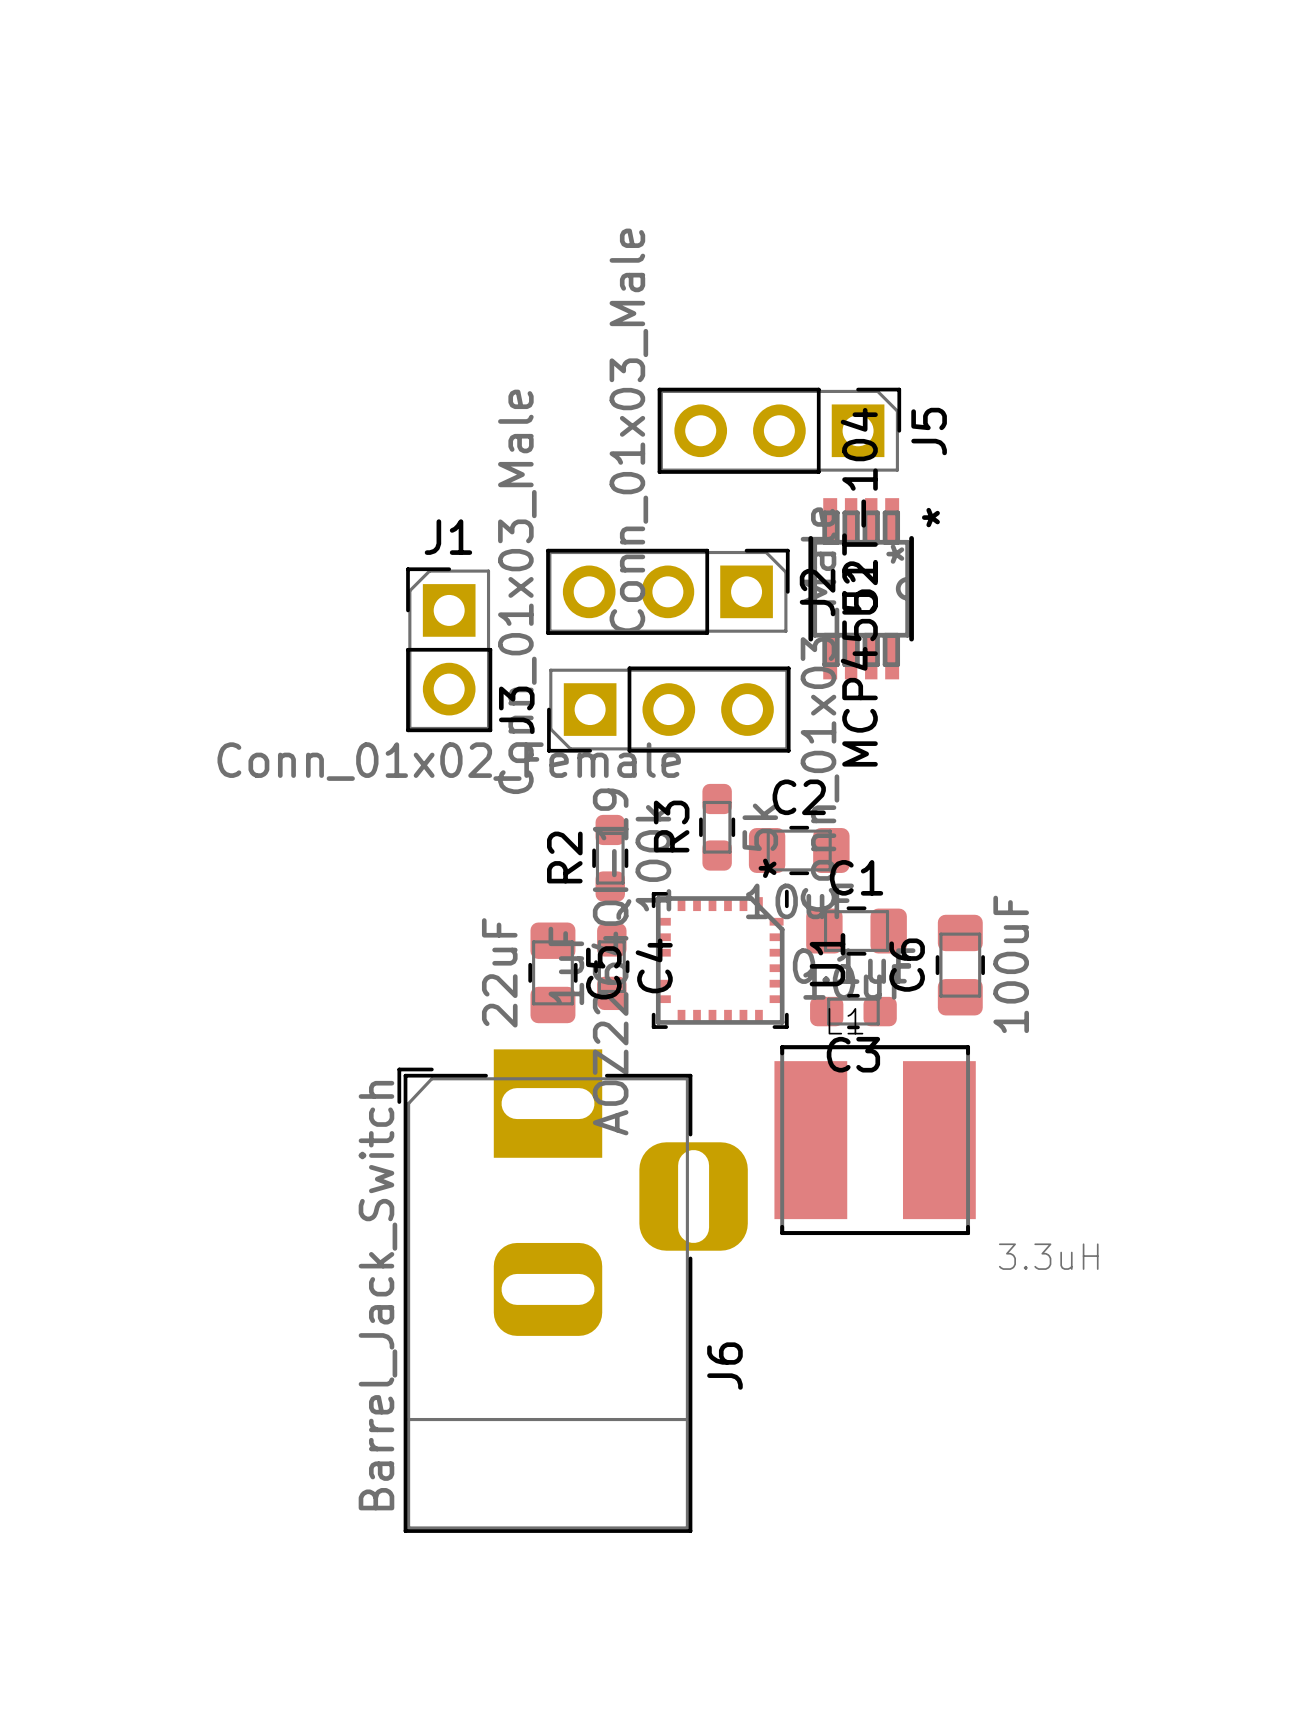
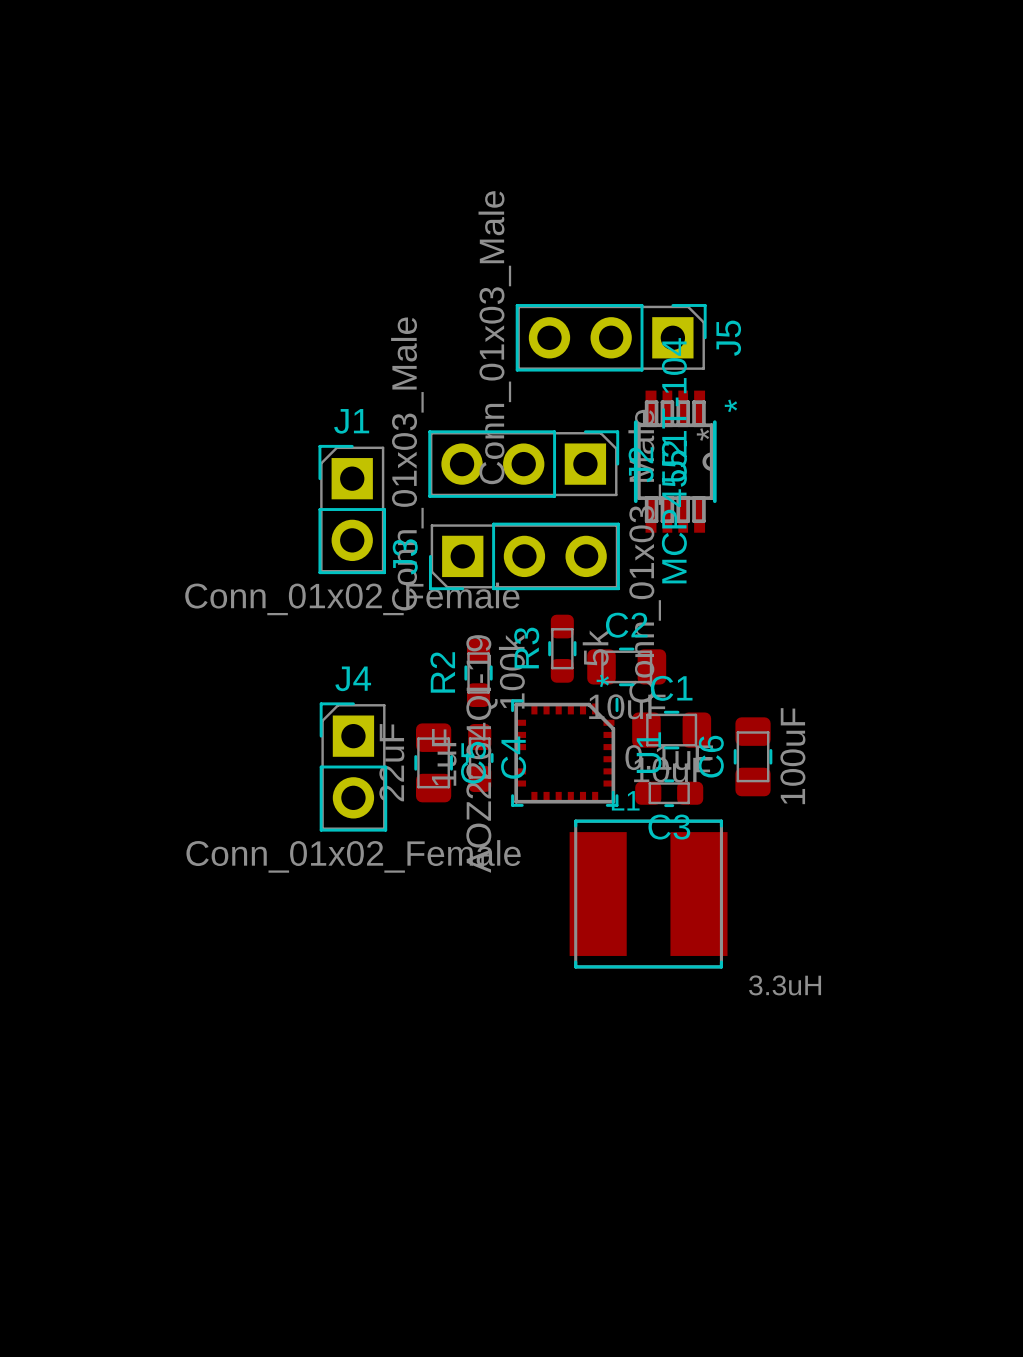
J4: none -> Conn_01x02_Female (353, 767)
L1 position: (875, 1140) -> (648, 894)
J6: Barrel_Jack_Switch (572, 1291) -> none

